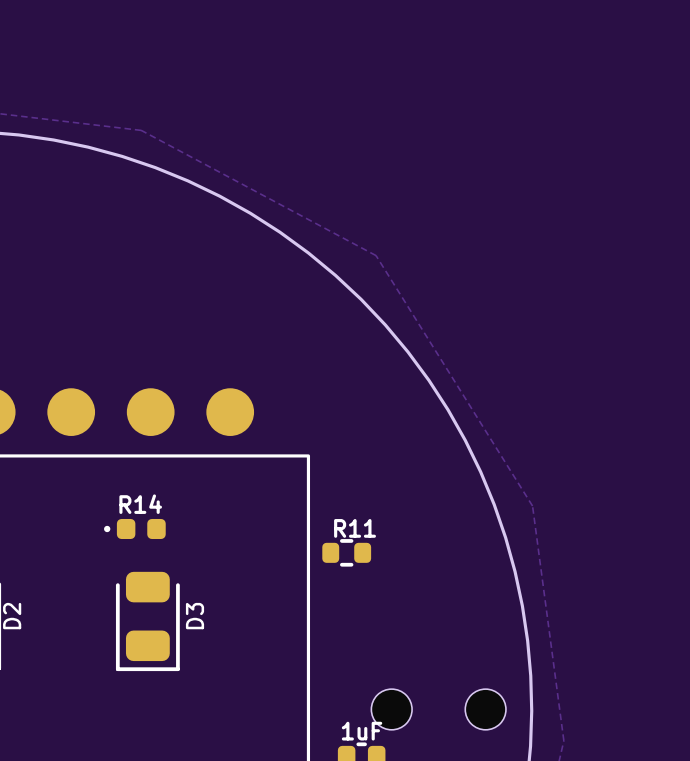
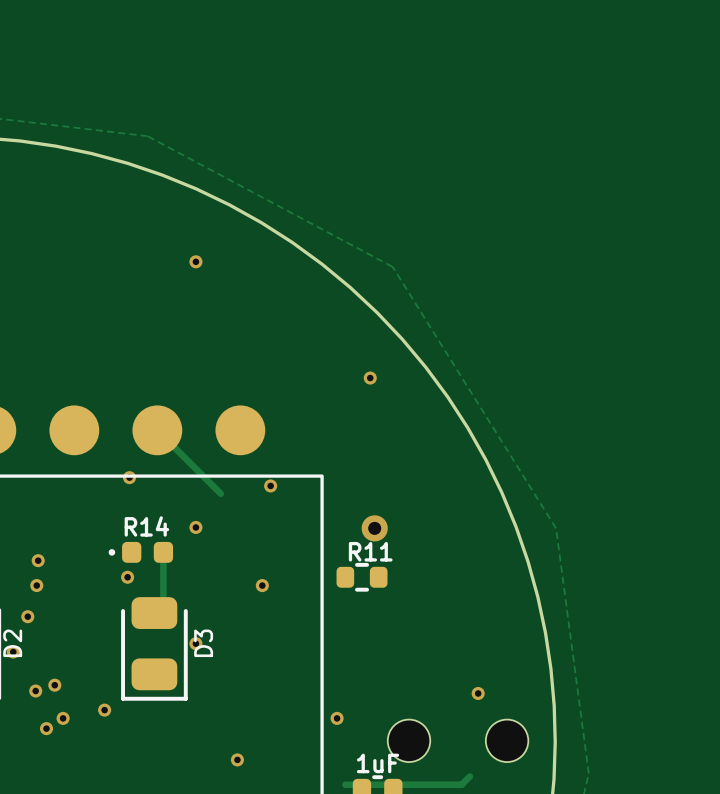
via: none -> (195, 261)
via: none -> (370, 378)
track: none -> (157, 430) (220, 493)
via: none -> (129, 477)
via: none -> (270, 485)
via: none -> (195, 527)
via: none -> (374, 528)
track: none -> (163, 552) (163, 604)
via: none -> (38, 560)
via: none -> (127, 577)
via: none -> (36, 585)
via: none -> (262, 585)
via: none -> (27, 616)
via: none -> (195, 643)
via: none -> (13, 651)
via: none -> (54, 685)
via: none -> (35, 691)
via: none -> (478, 693)
via: none -> (104, 710)
via: none -> (63, 718)
via: none -> (337, 718)
via: none -> (46, 728)
via: none -> (237, 759)
track: none -> (469, 776) (461, 784) (345, 784)

